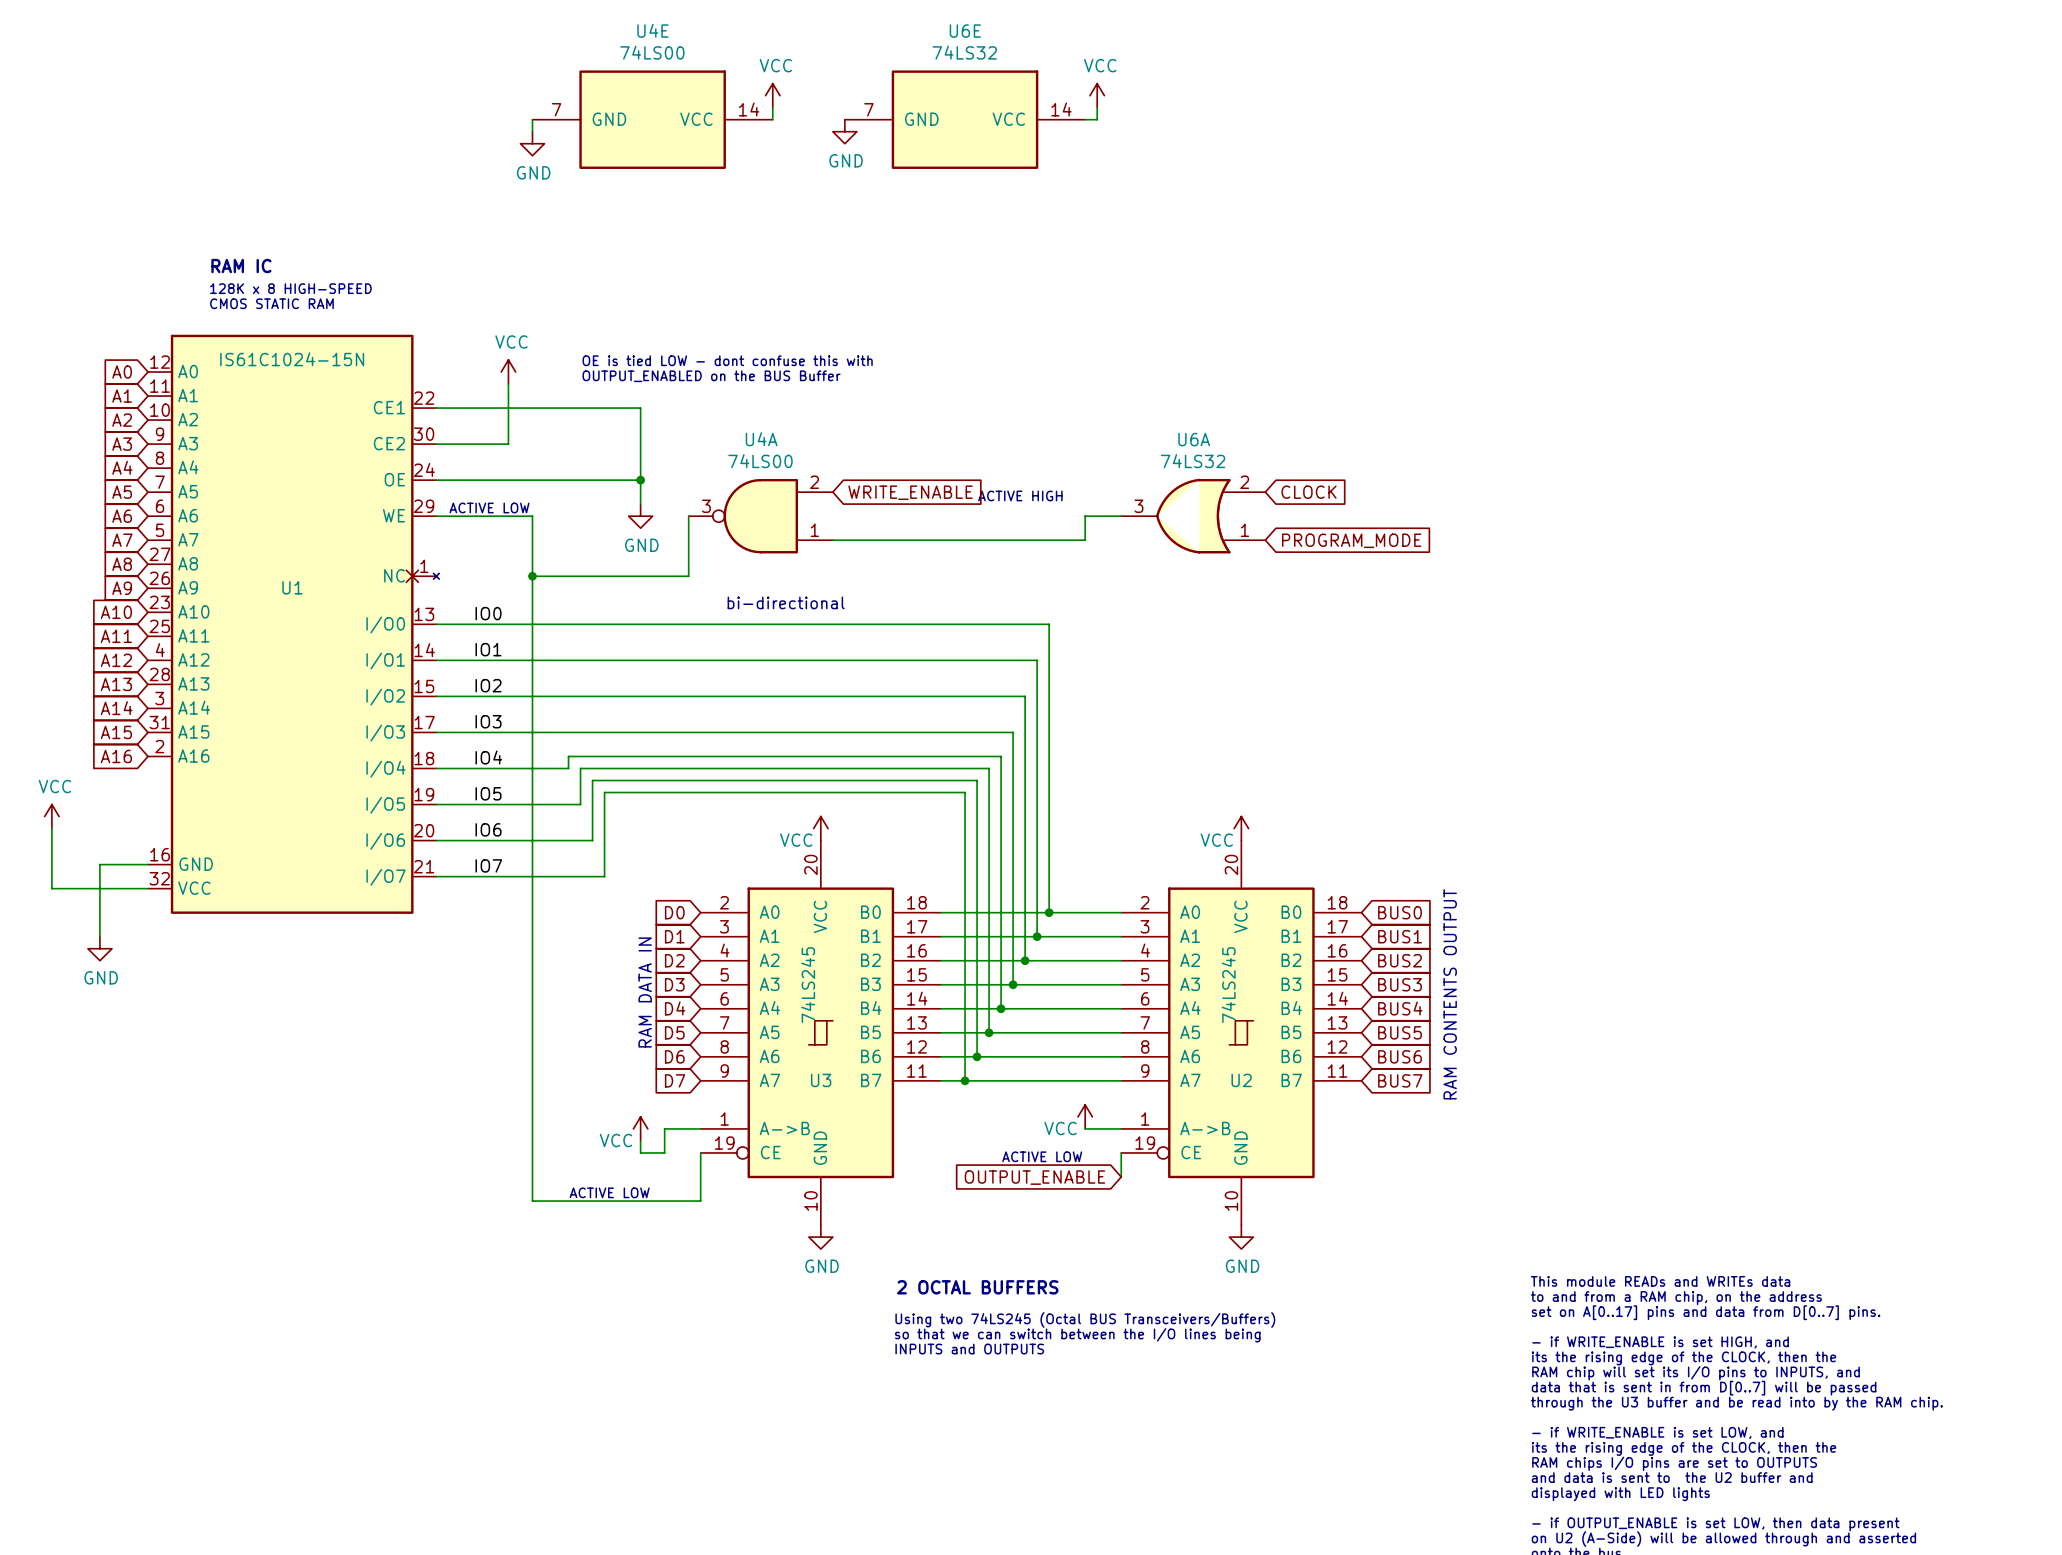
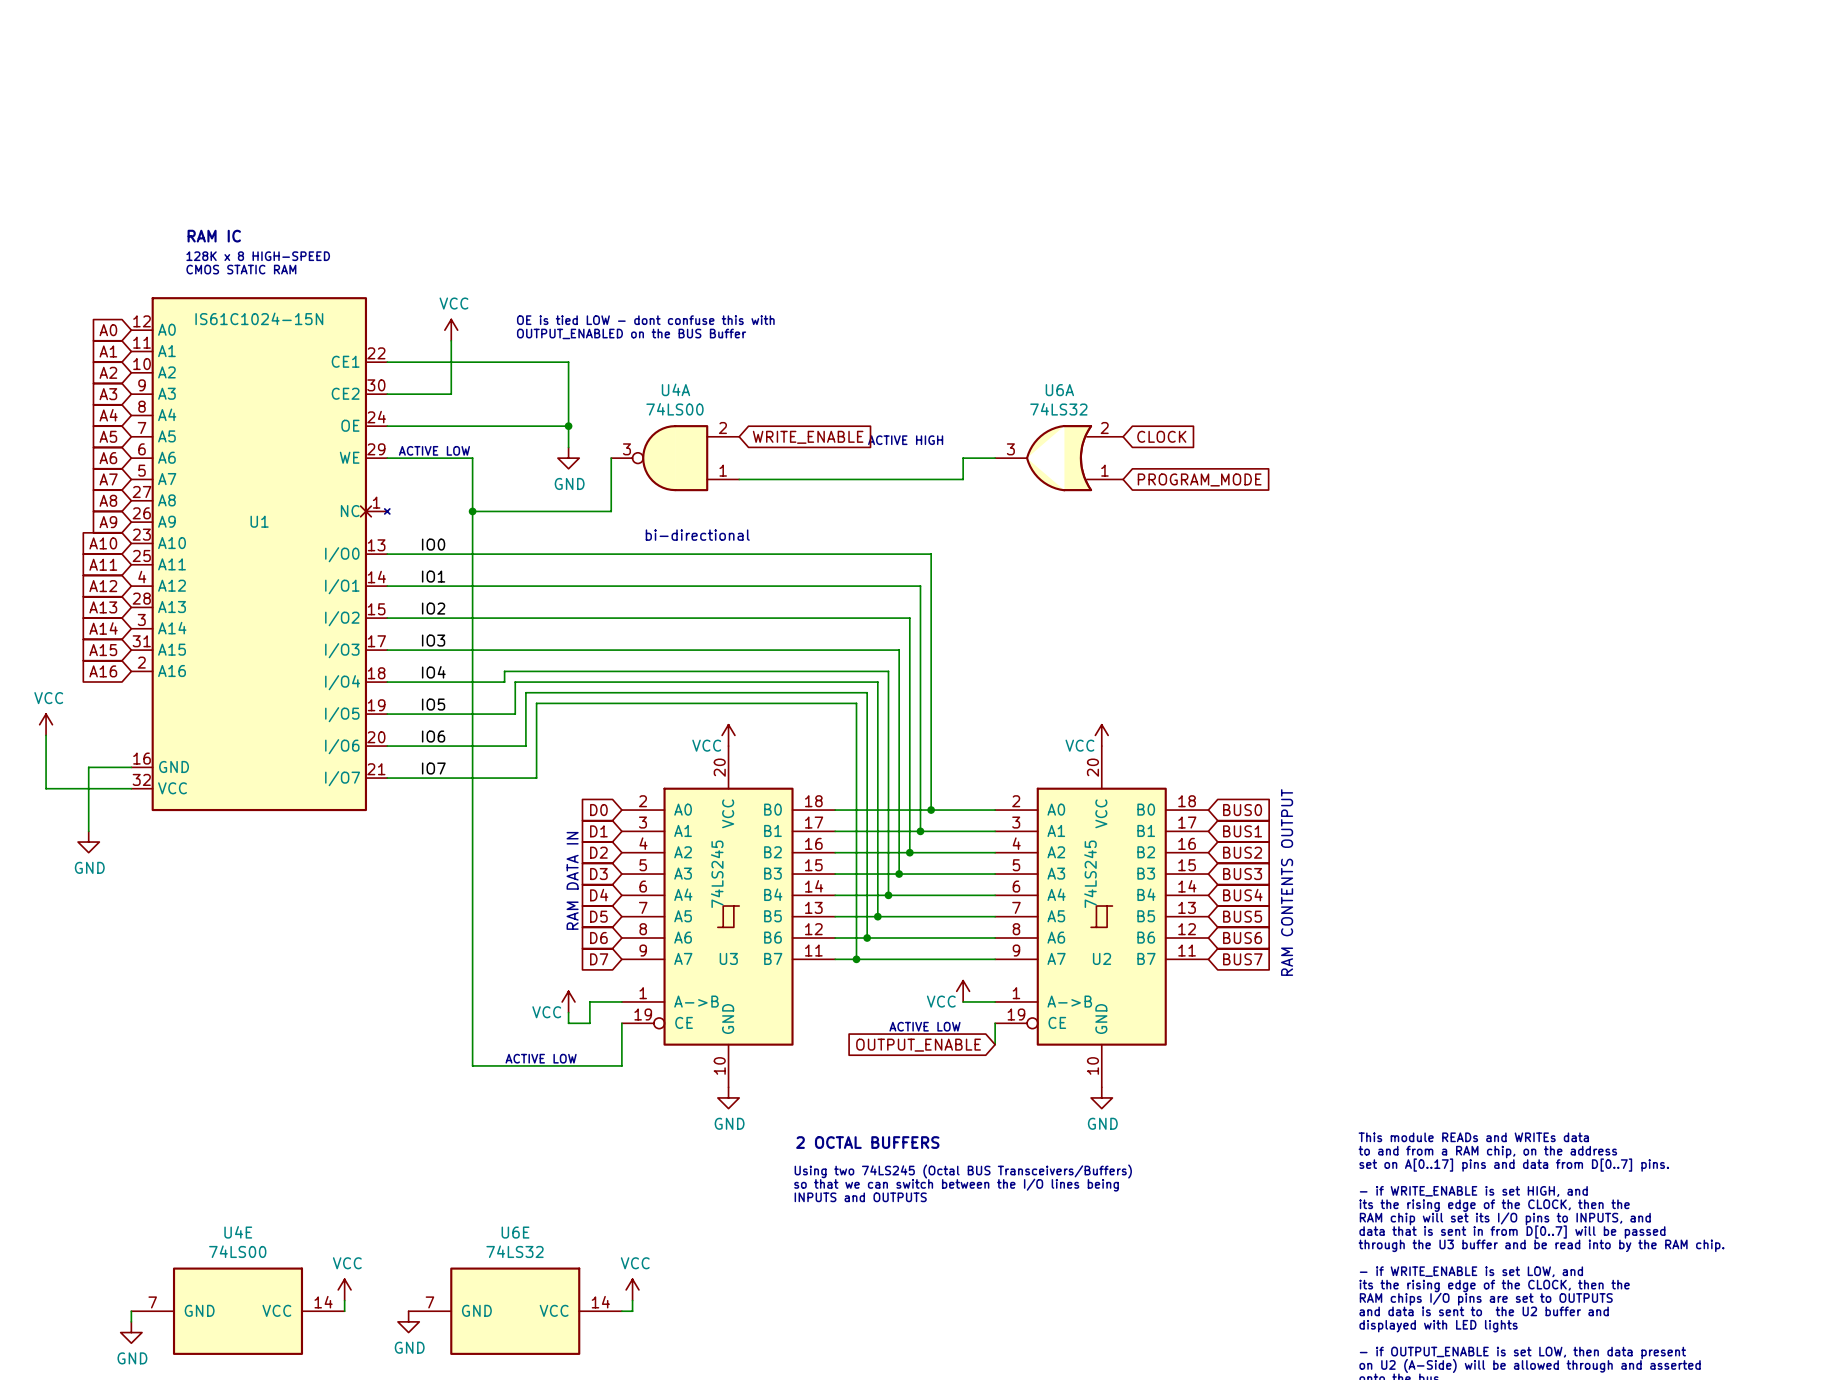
power symbol: VCC (772, 95) -> none
power symbol: VCC (1097, 95) -> none
wire: (772, 107) (772, 119) -> none
wire: (1097, 107) (1097, 119) (1085, 119) -> none
wire: (532, 119) (532, 131) -> none
U4E position: (652, 119) -> (238, 1311)
U6E position: (965, 119) -> (515, 1311)
power symbol: GND (844, 131) -> none
power symbol: GND (532, 143) -> none
power symbol: none -> VCC (344, 1289)
power symbol: none -> VCC (632, 1289)
wire: none -> (344, 1300) (344, 1311)
wire: none -> (632, 1300) (632, 1311) (621, 1311)
wire: none -> (131, 1311) (131, 1321)
power symbol: none -> GND (408, 1321)
power symbol: none -> GND (131, 1332)

